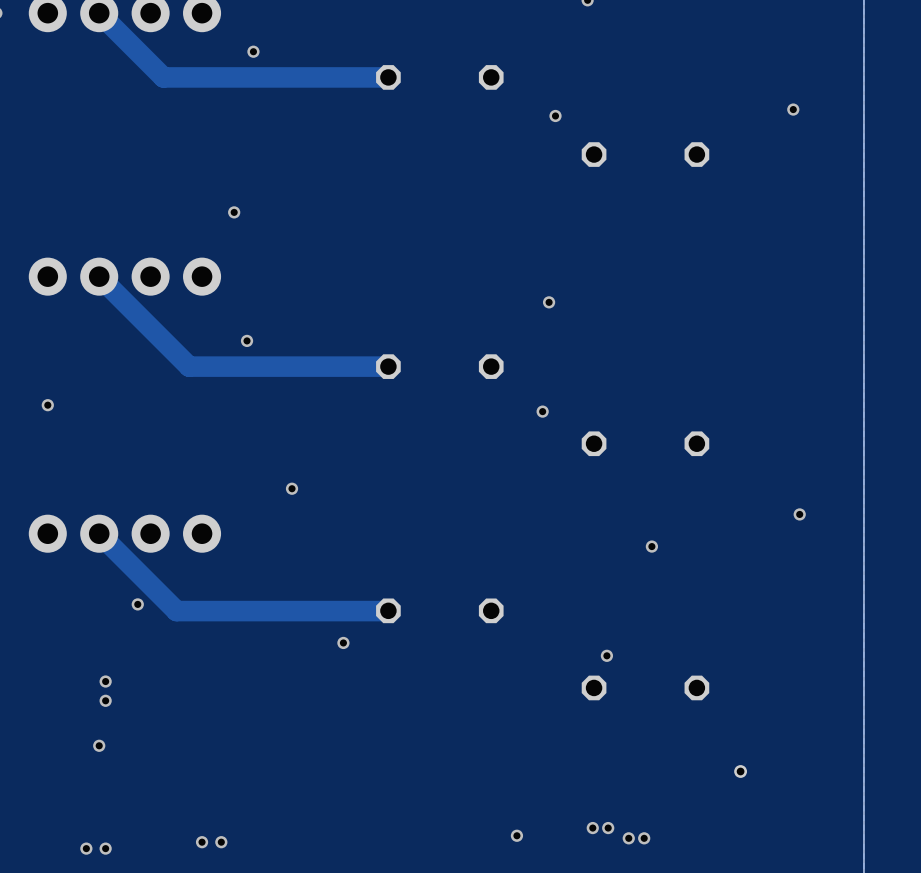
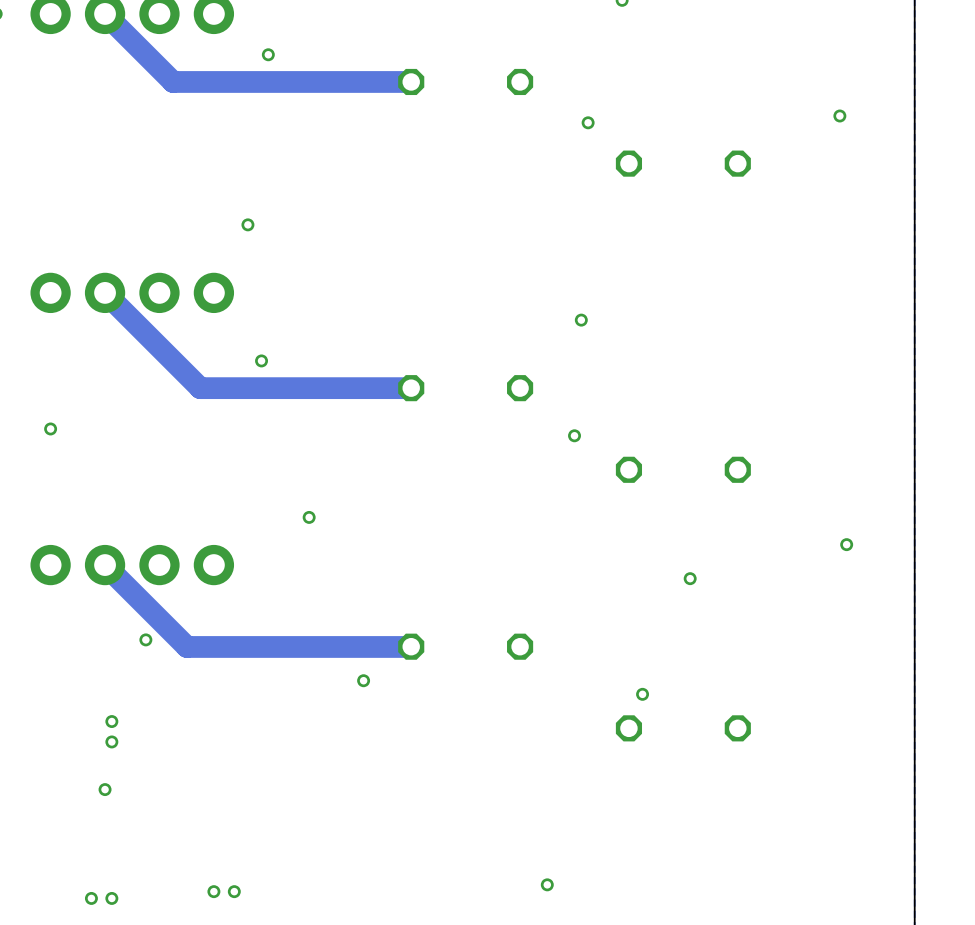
part: (740, 771) -> none
via: (592, 828) -> none
via: (608, 828) -> none
via: (628, 838) -> none
via: (644, 838) -> none

